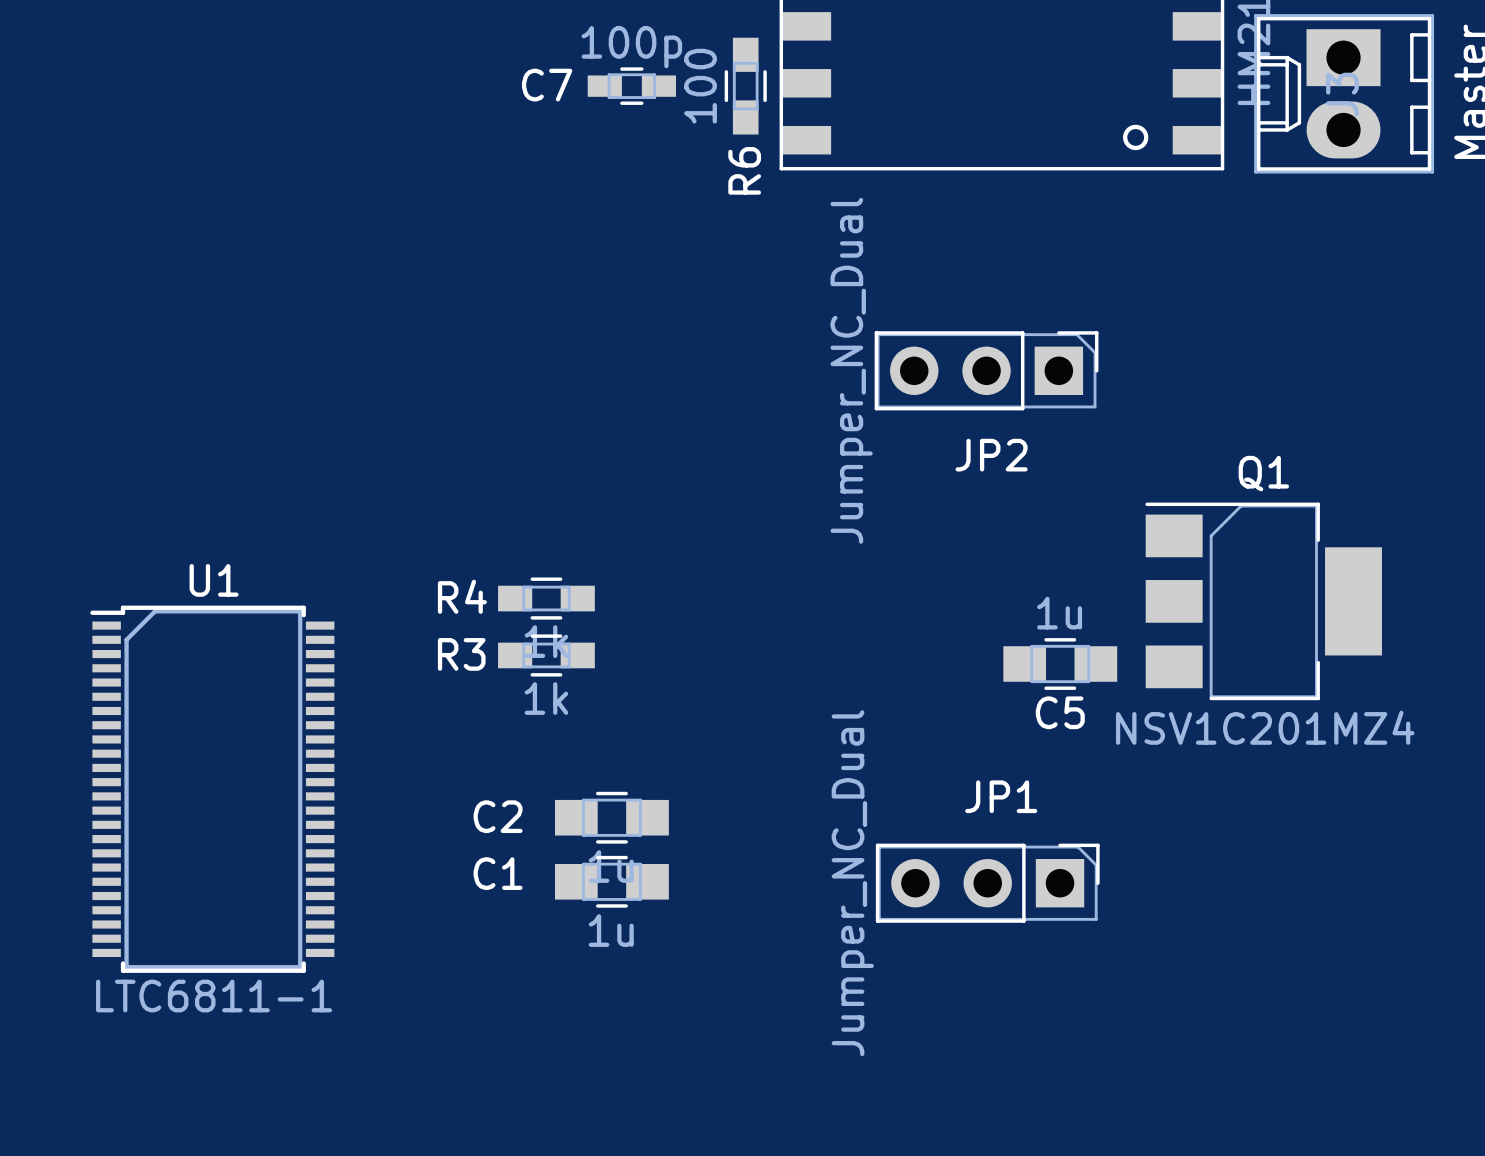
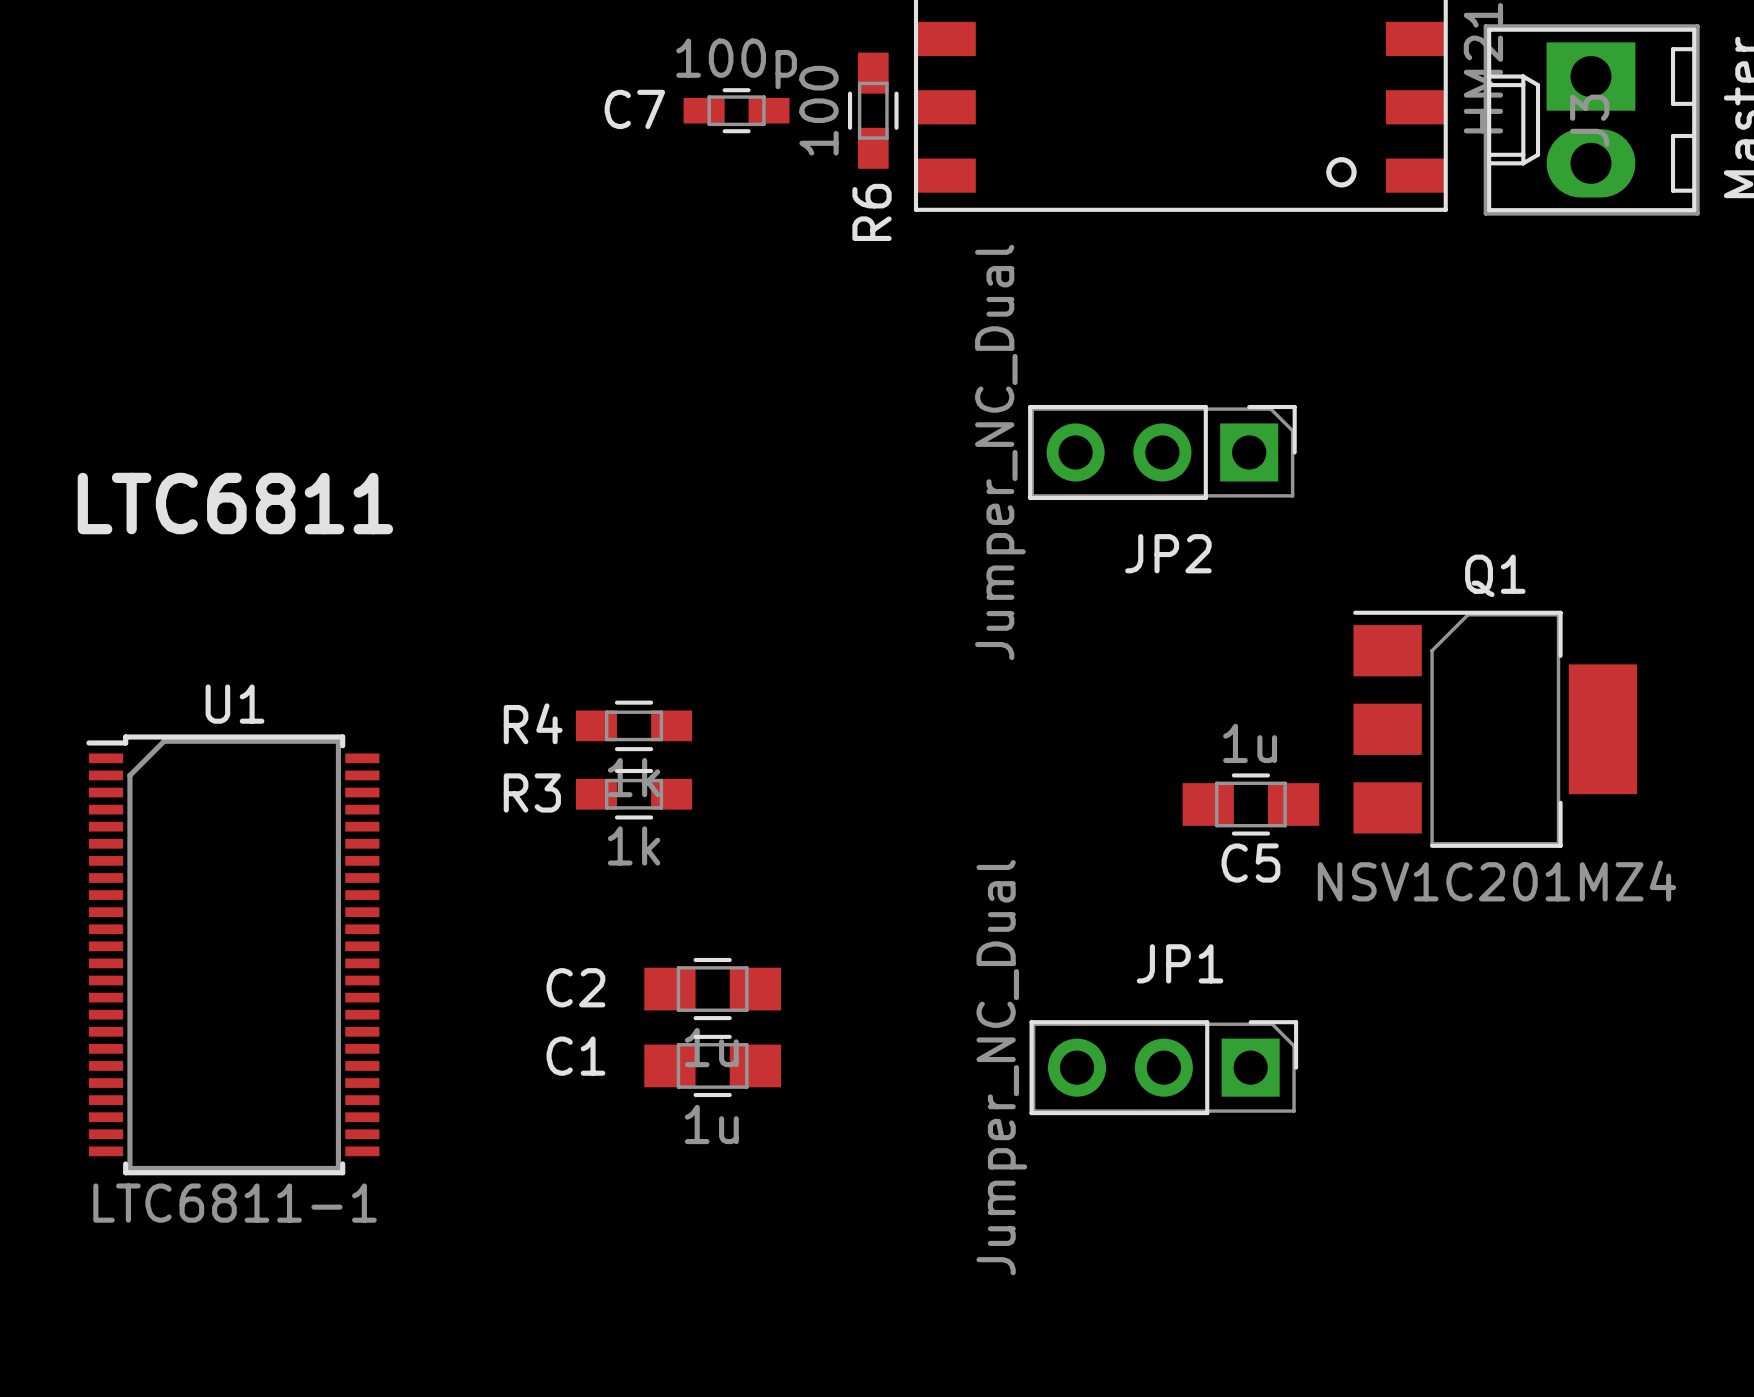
text: none -> LTC6811 (235, 503)

